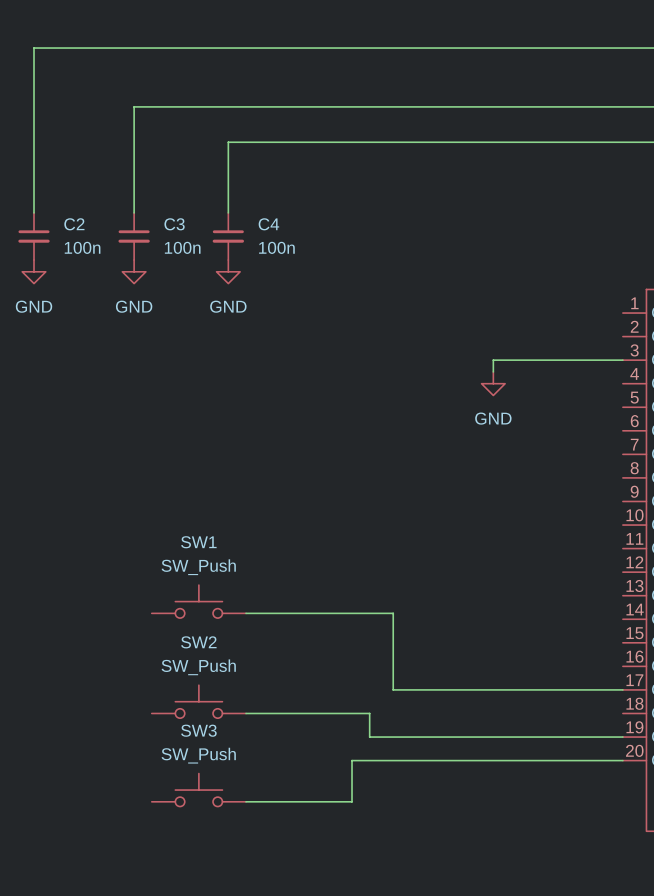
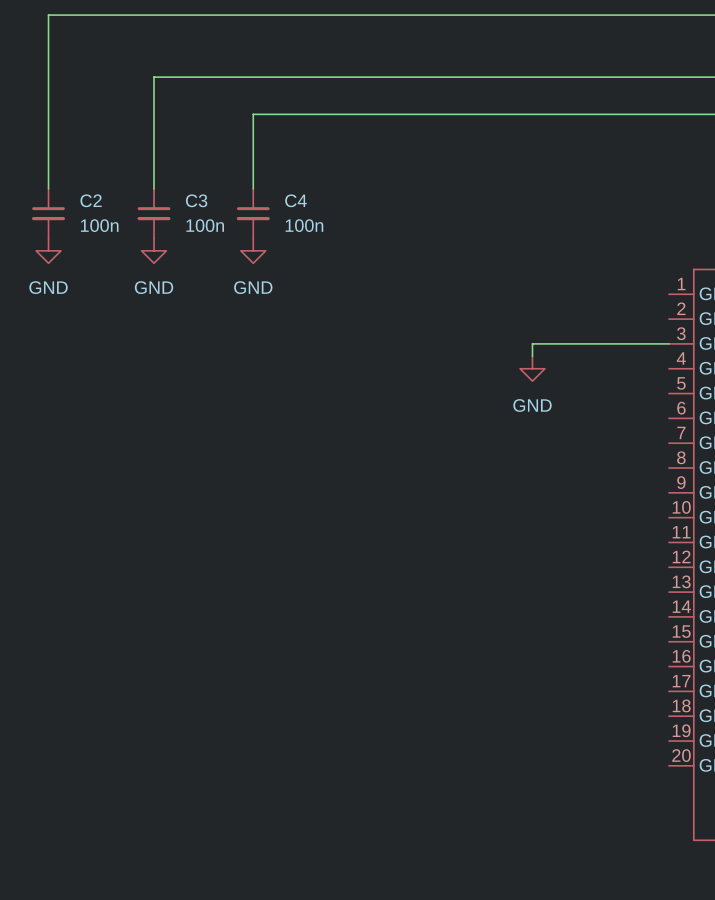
SW1: SW_Push (198, 601) -> none
wire: (246, 613) (393, 613) (393, 689) (622, 689) -> none
SW2: SW_Push (198, 701) -> none
wire: (246, 713) (369, 713) (369, 737) (622, 737) -> none
wire: (622, 760) (352, 760) (352, 801) (246, 801) -> none
SW3: SW_Push (198, 790) -> none

